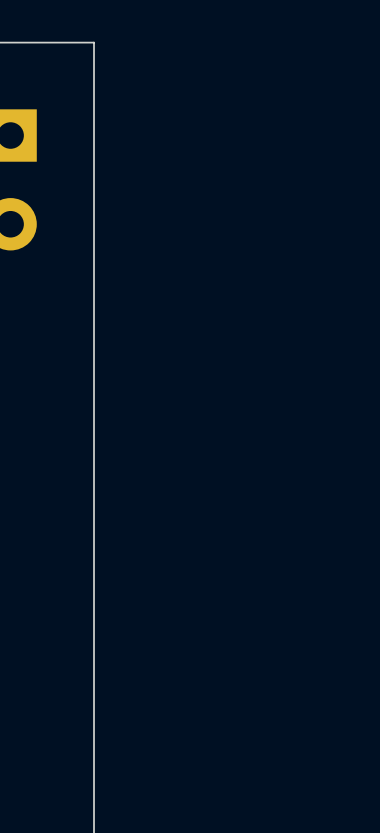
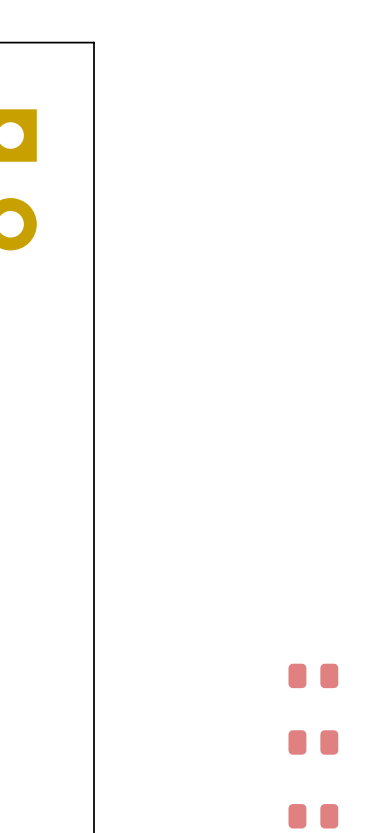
part: none -> (313, 675)
part: none -> (313, 742)
part: none -> (313, 816)

